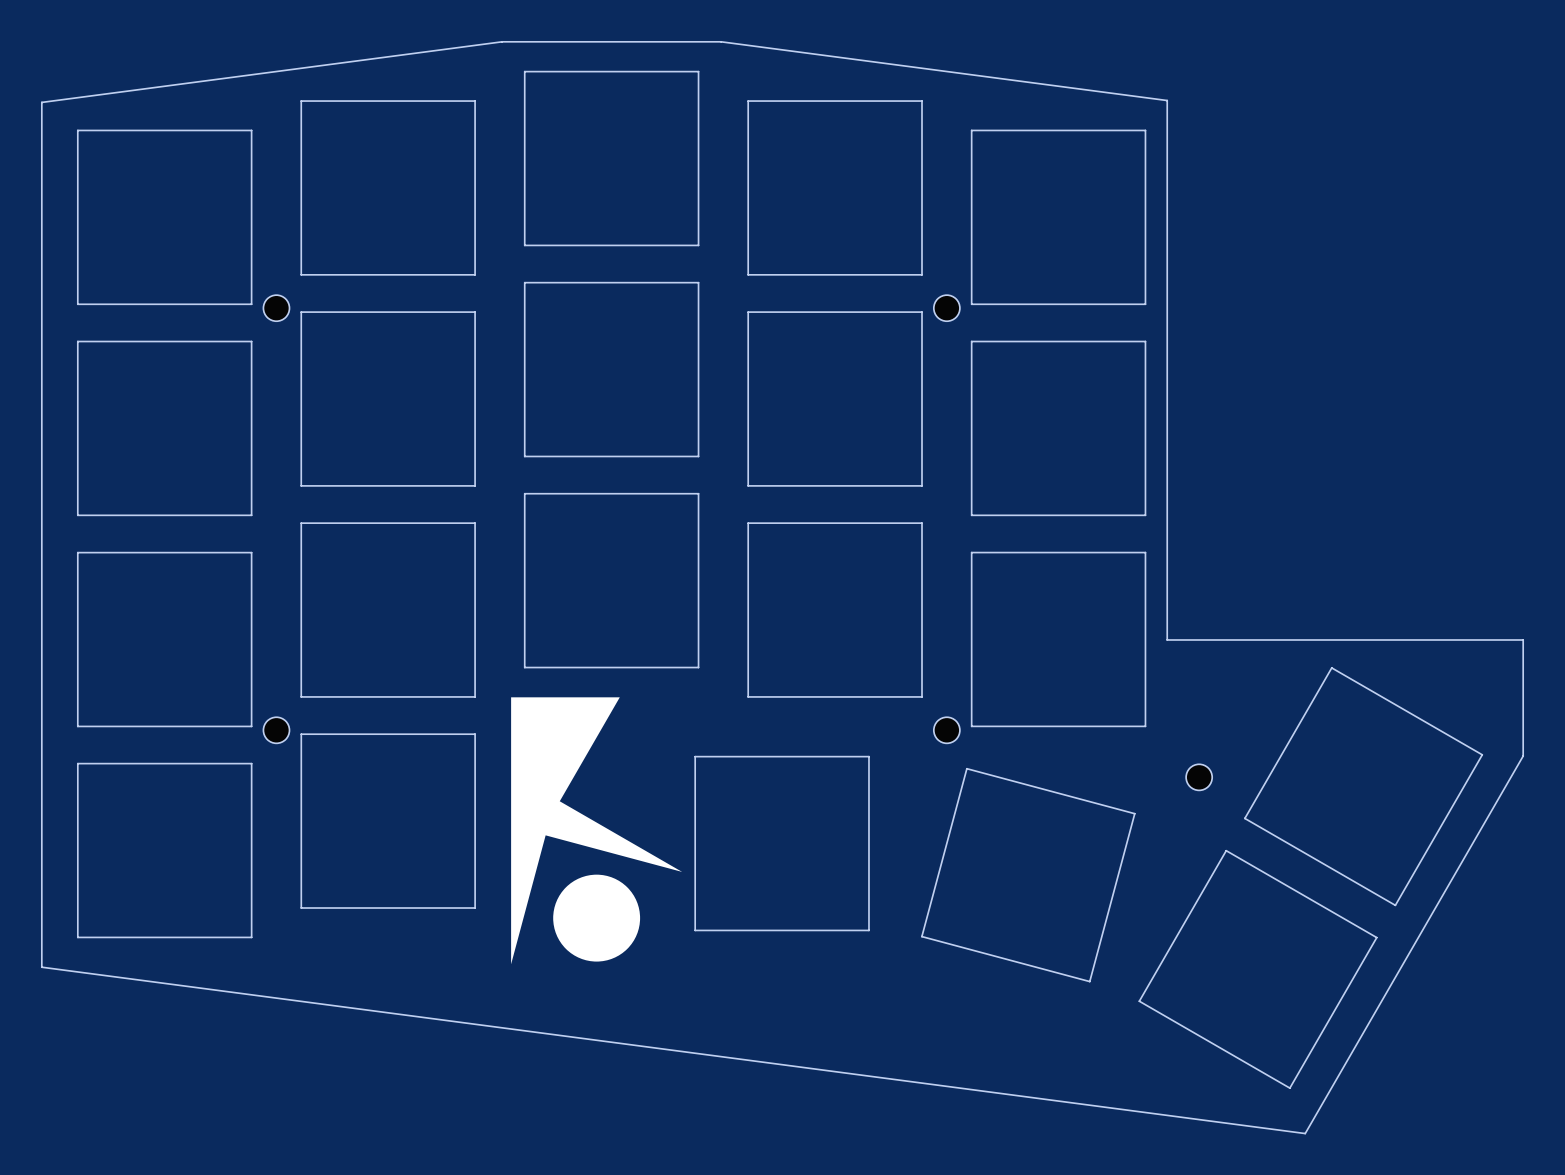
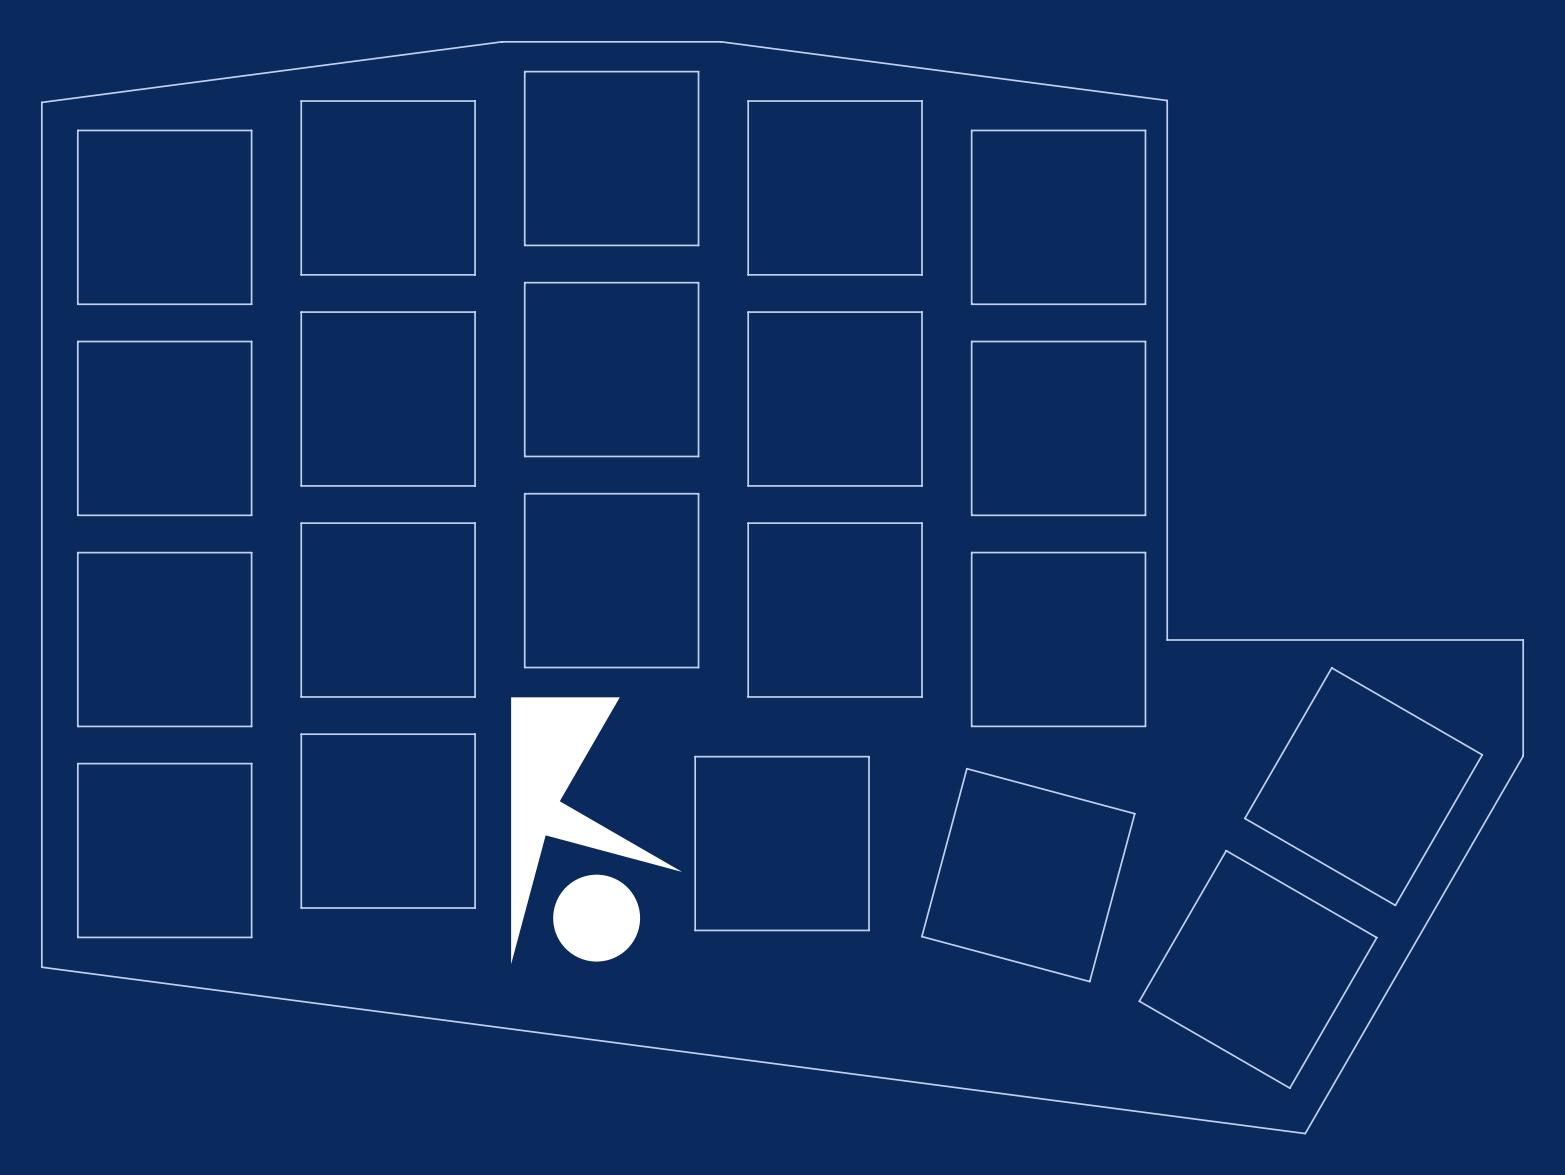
part: (276, 308) -> none
part: (946, 308) -> none
part: (276, 730) -> none
part: (946, 730) -> none
part: (1199, 777) -> none

